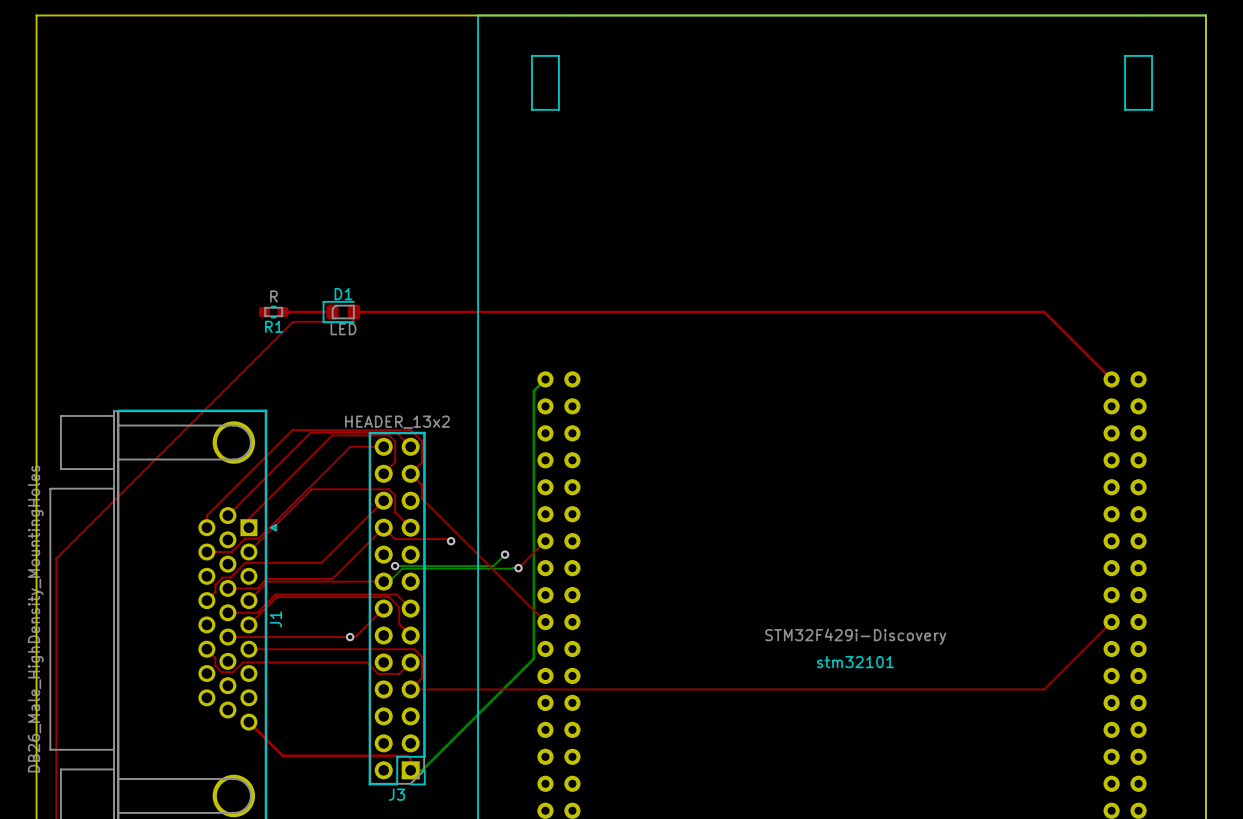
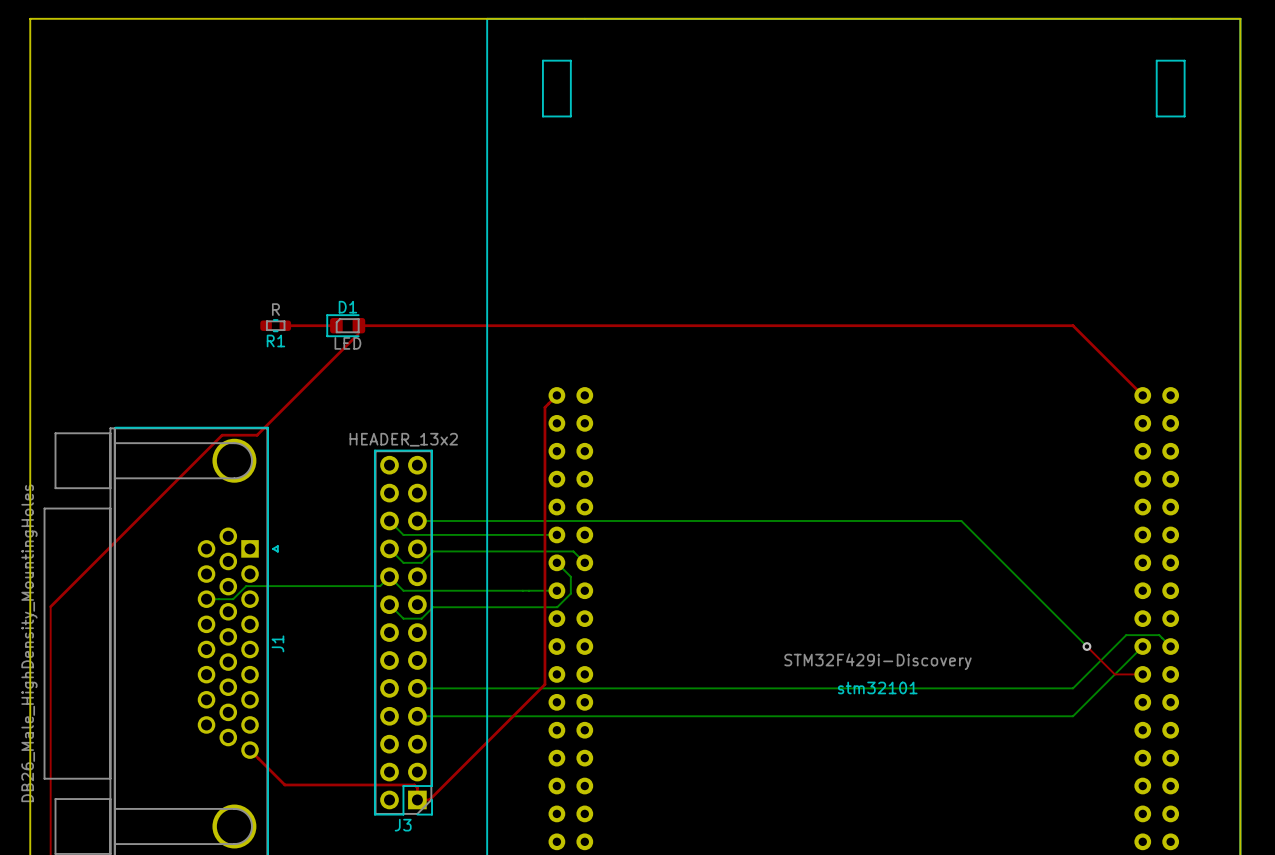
top track: (351, 321) (293, 321) (56, 558) (56, 583) -> (356, 335) (257, 435) (222, 435) (50, 606)
top track: none -> (556, 395) (544, 407) (544, 684) (429, 799) (417, 799)
bottom track: (545, 379) (533, 390) (533, 658) (422, 770) (410, 770) -> none
top track: (383, 446) (350, 446) (258, 538) (245, 538) (231, 551) (206, 551) -> none
top track: (410, 446) (396, 432) (310, 432) (227, 515) -> none
top track: (383, 473) (395, 462) (395, 441) (389, 435) (332, 435) (248, 518) (248, 527) -> none
top track: (383, 500) (321, 562) (245, 562) (230, 577) (222, 577) (215, 584) (215, 592) (206, 600) -> none
bottom track: none -> (389, 520) (403, 534) (556, 534)
bottom track: none -> (417, 520) (961, 520) (1086, 646)
top track: (206, 527) (206, 515) (292, 430) (410, 430) (422, 441) (422, 462) (410, 473) (422, 485) (422, 498) (545, 622) -> none
bottom track: none -> (389, 548) (403, 562) (421, 562) (433, 551) (573, 551) (584, 562)
top track: (410, 527) (395, 512) (395, 495) (389, 489) (311, 489) (248, 551) -> none
top track: (451, 541) (449, 539) (395, 539) (383, 527) (332, 578) (266, 578) (257, 588) (227, 588) -> none
via: (451, 541) -> none
top track: (545, 541) (518, 568) -> none
bottom track: (505, 554) (493, 566) (395, 566) -> none
via: (505, 554) -> none
via: (395, 566) -> none
bottom track: (512, 568) (402, 568) (389, 581) (383, 581) -> (556, 562) (570, 576) (570, 593) (557, 607) (433, 607) (421, 618) (403, 618) (389, 604)
bottom track: none -> (522, 590) (403, 590) (389, 576) (380, 586) (246, 586) (233, 599) (206, 599)
bottom track: none -> (529, 590) (556, 590)
via: (518, 568) -> none
top track: (383, 581) (267, 581) (248, 600) -> none
top track: (383, 608) (355, 637) (227, 637) -> none
top track: (410, 608) (396, 594) (275, 594) (257, 612) (227, 612) -> none
top track: none -> (1086, 646) (1114, 674) (1142, 674)
via: none -> (1086, 646)
top track: (1111, 622) (1044, 689) (410, 689) (422, 678) (422, 657) (414, 649) (248, 649) -> none
bottom track: none -> (1142, 646) (1073, 716) (417, 716)
bottom track: none -> (1170, 646) (1159, 635) (1126, 635) (1073, 688) (417, 688)
top track: (248, 624) (276, 597) (389, 597) (399, 607) (399, 624) (410, 635) -> none
via: (350, 637) -> none
top track: (206, 649) (215, 657) (215, 665) (221, 672) (233, 672) (242, 662) (366, 662) (378, 673) (399, 673) (410, 662) -> none

